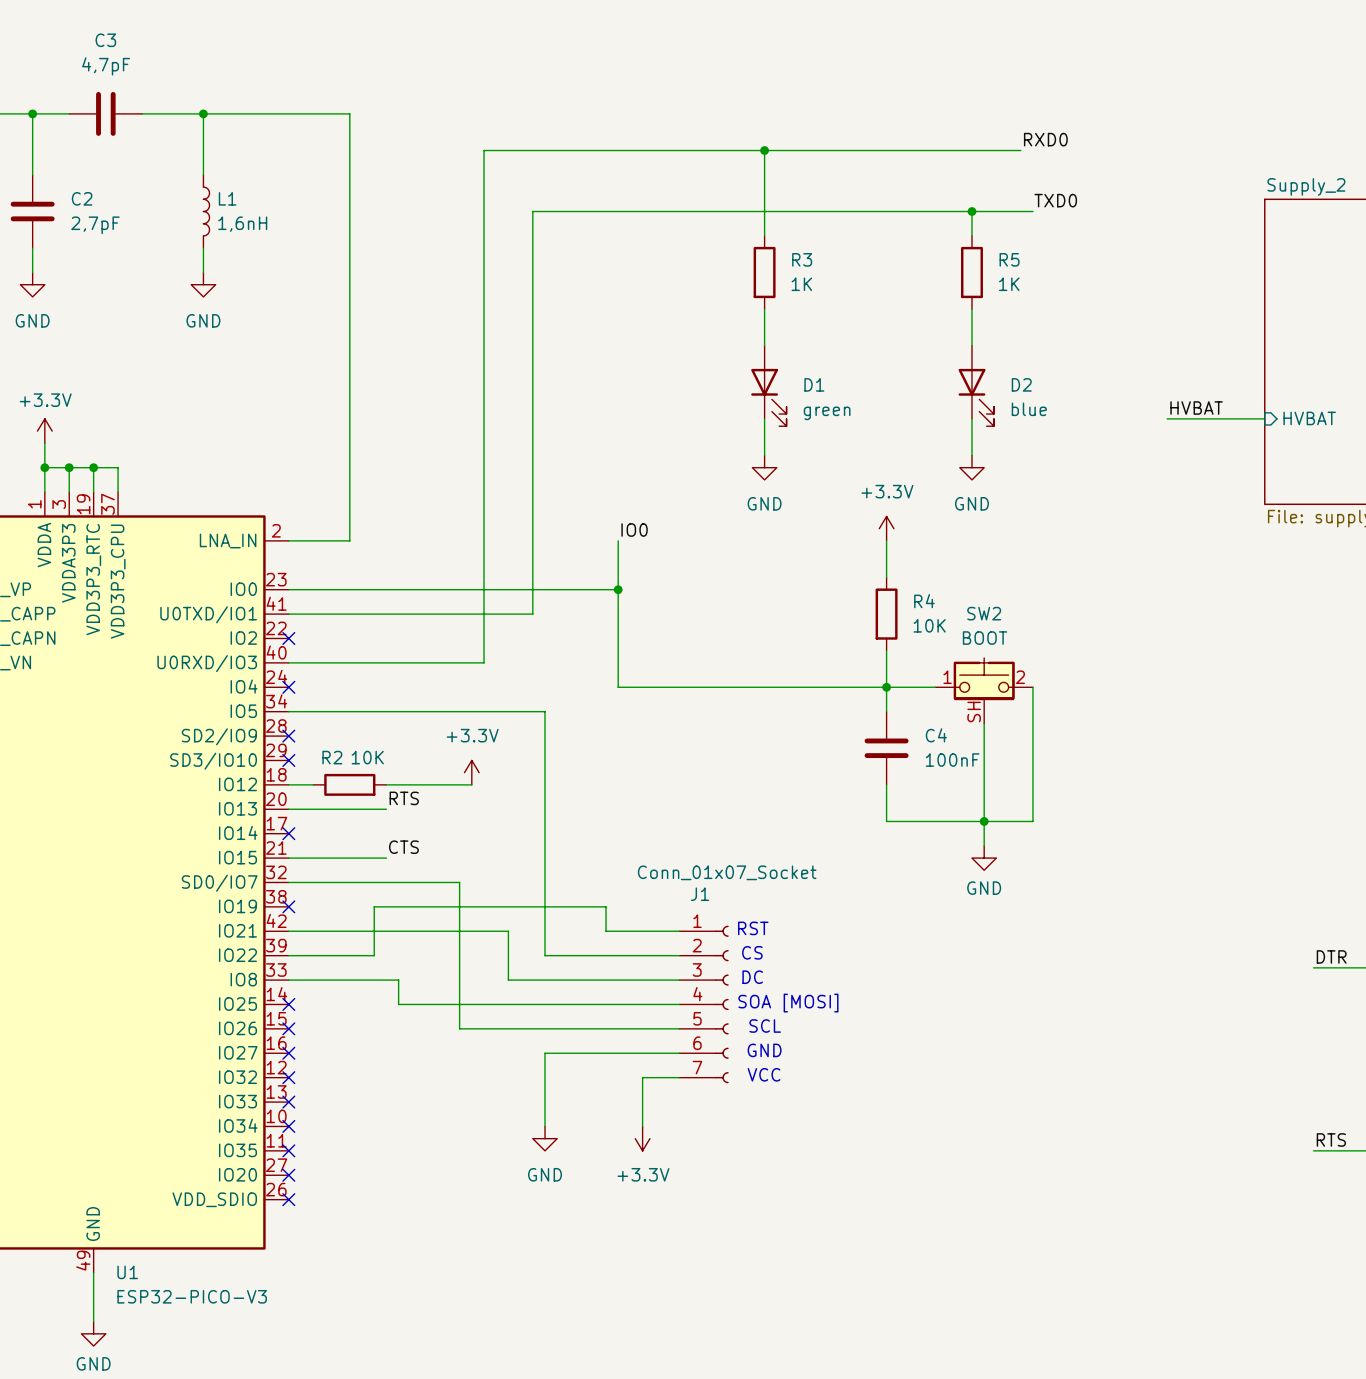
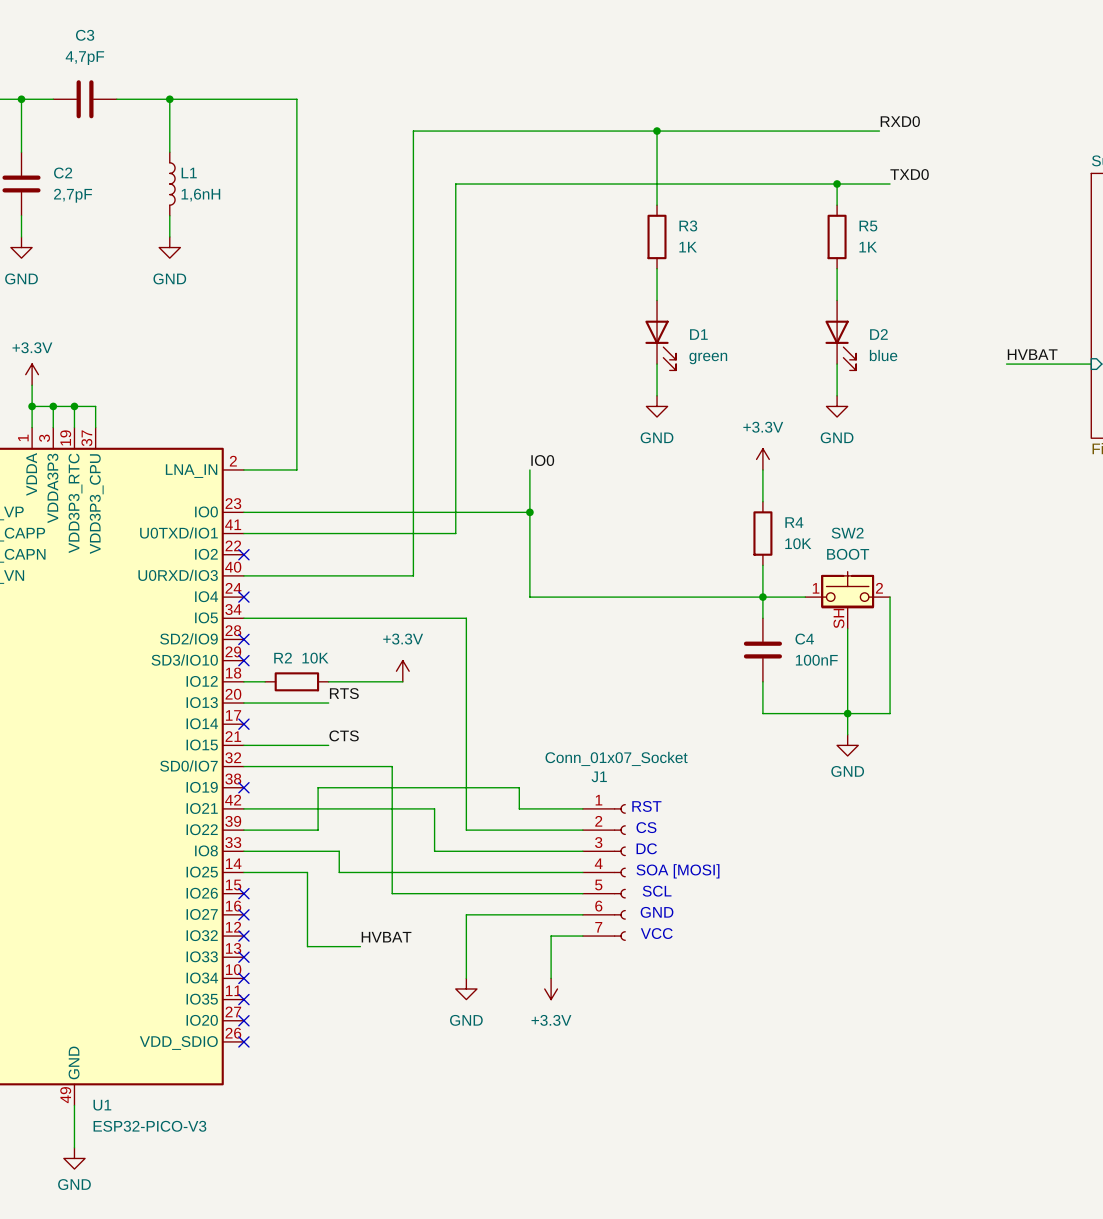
wire: none -> (243, 872) (307, 872) (307, 946) (360, 946)
no-connect mark: (288, 1004) -> none
label: none -> HVBAT (386, 937)

